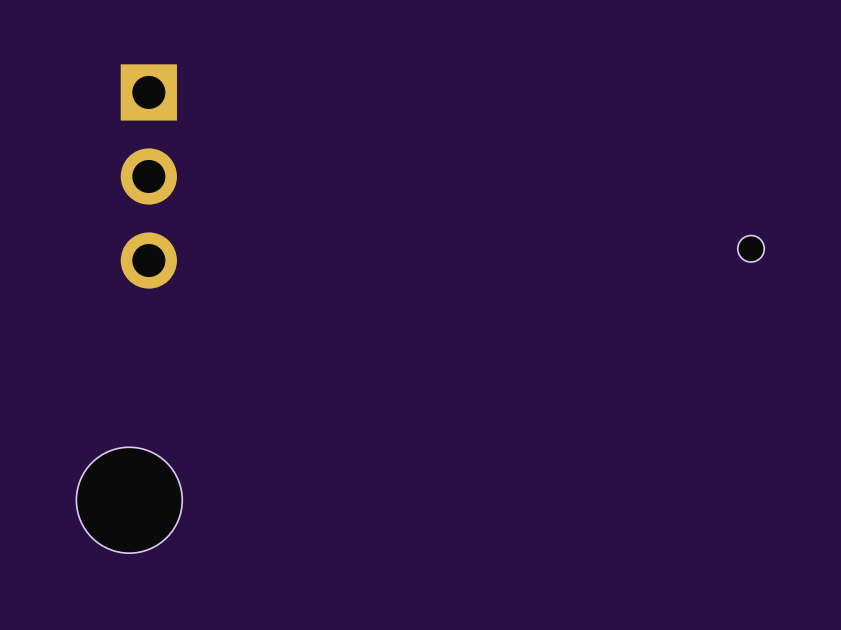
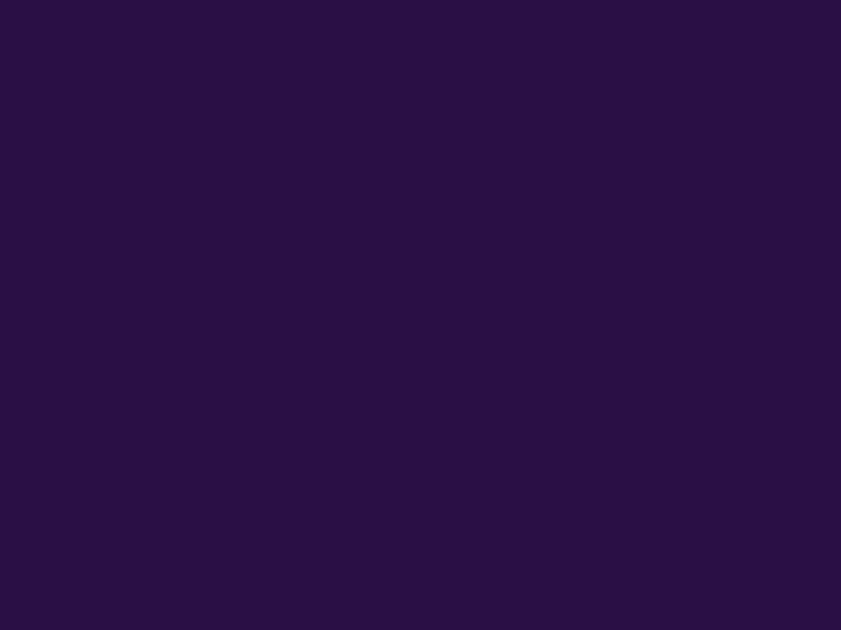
part: (148, 176) -> none
part: (751, 248) -> none
part: (129, 500) -> none

